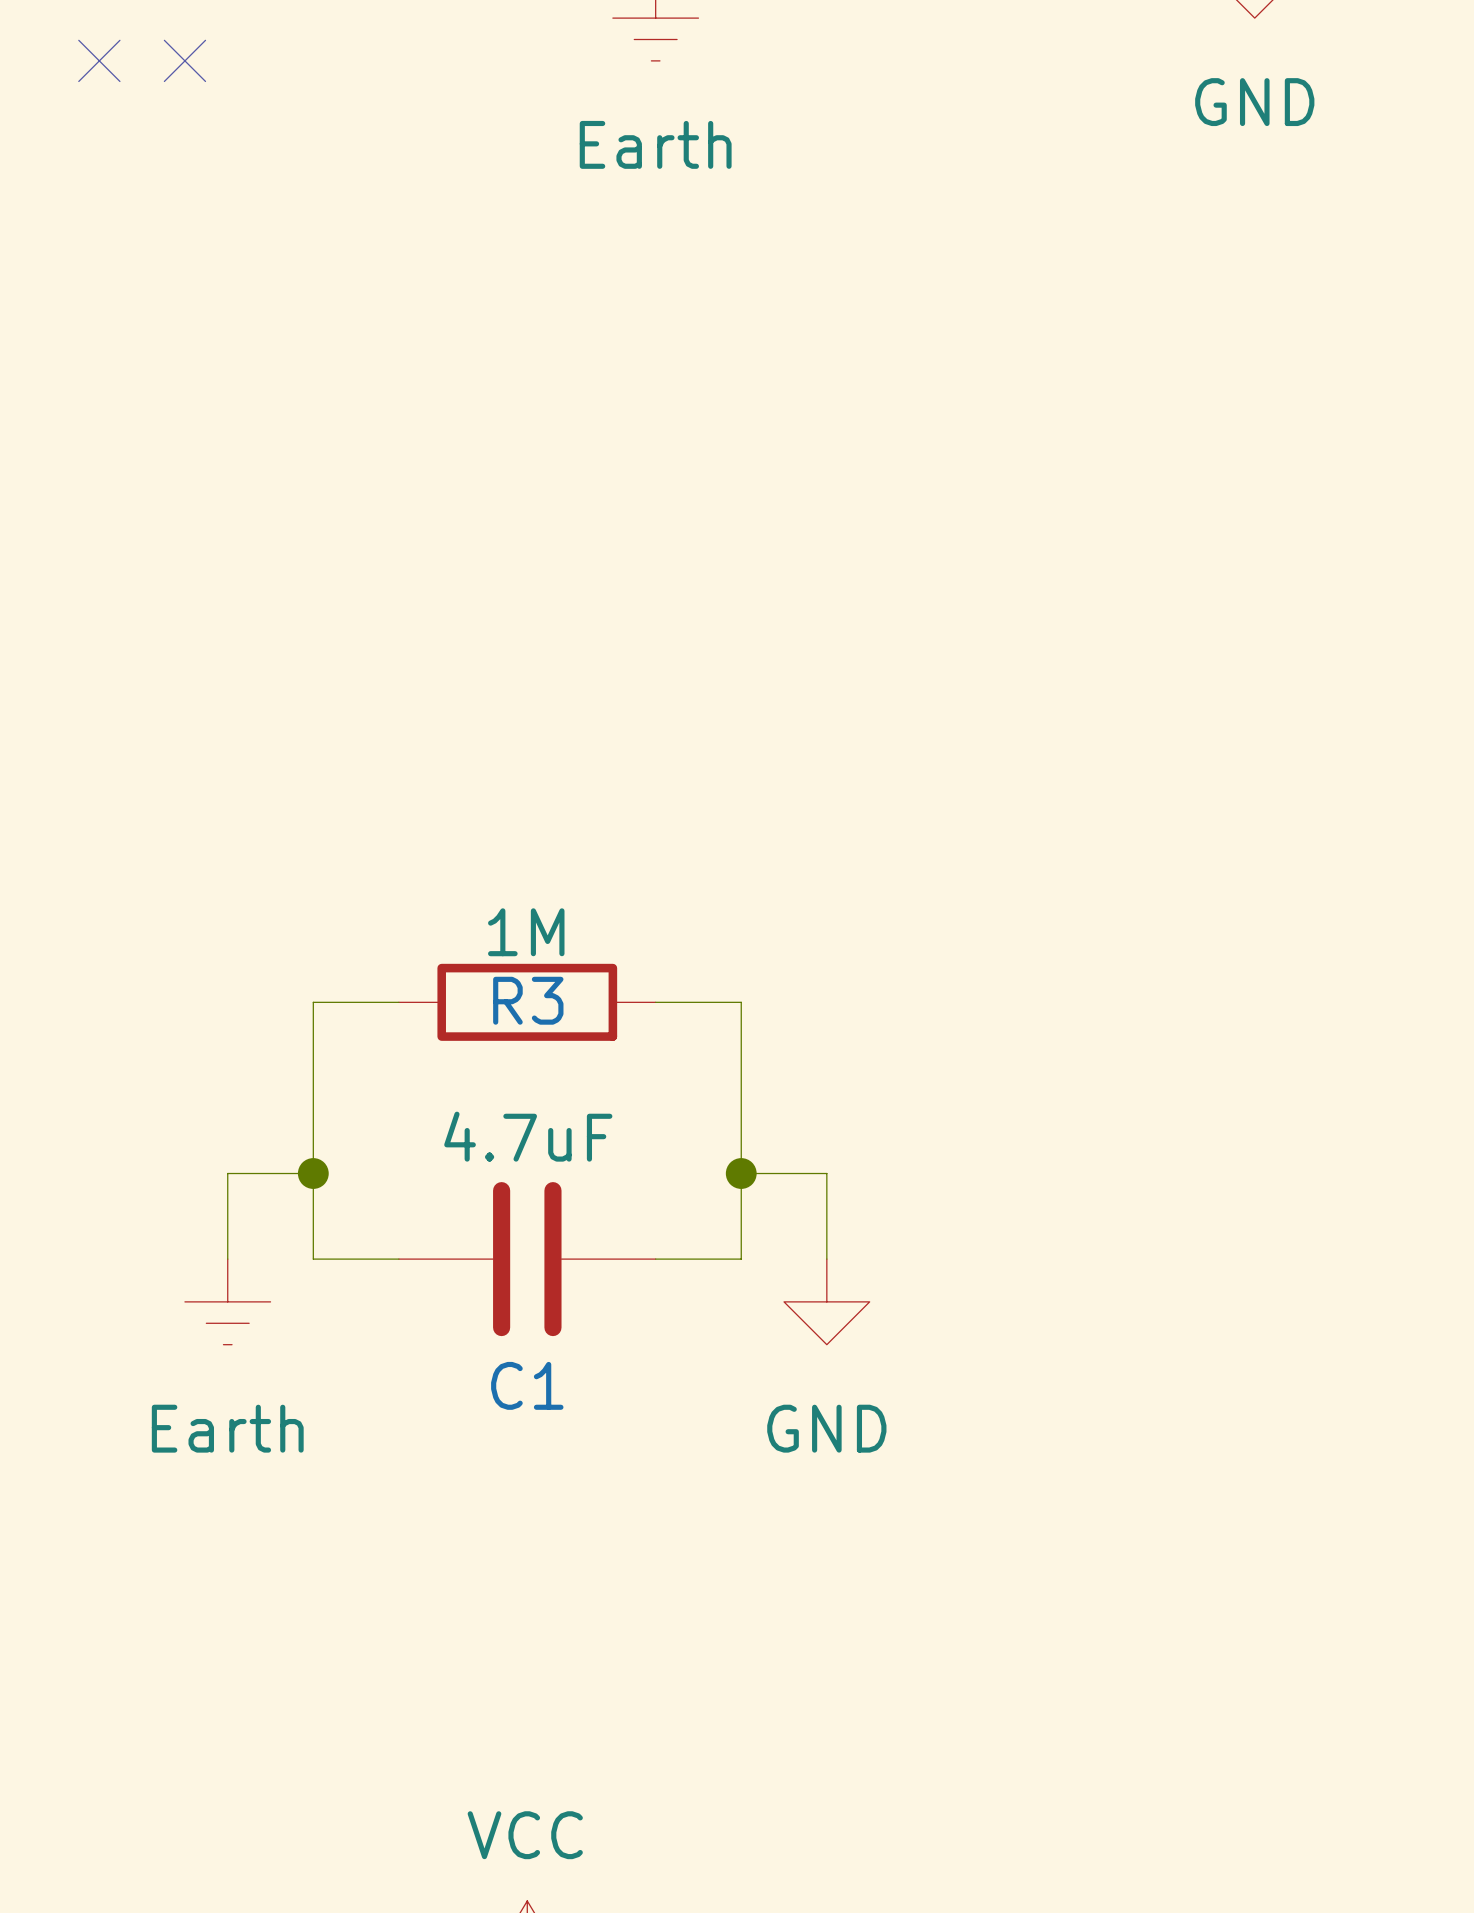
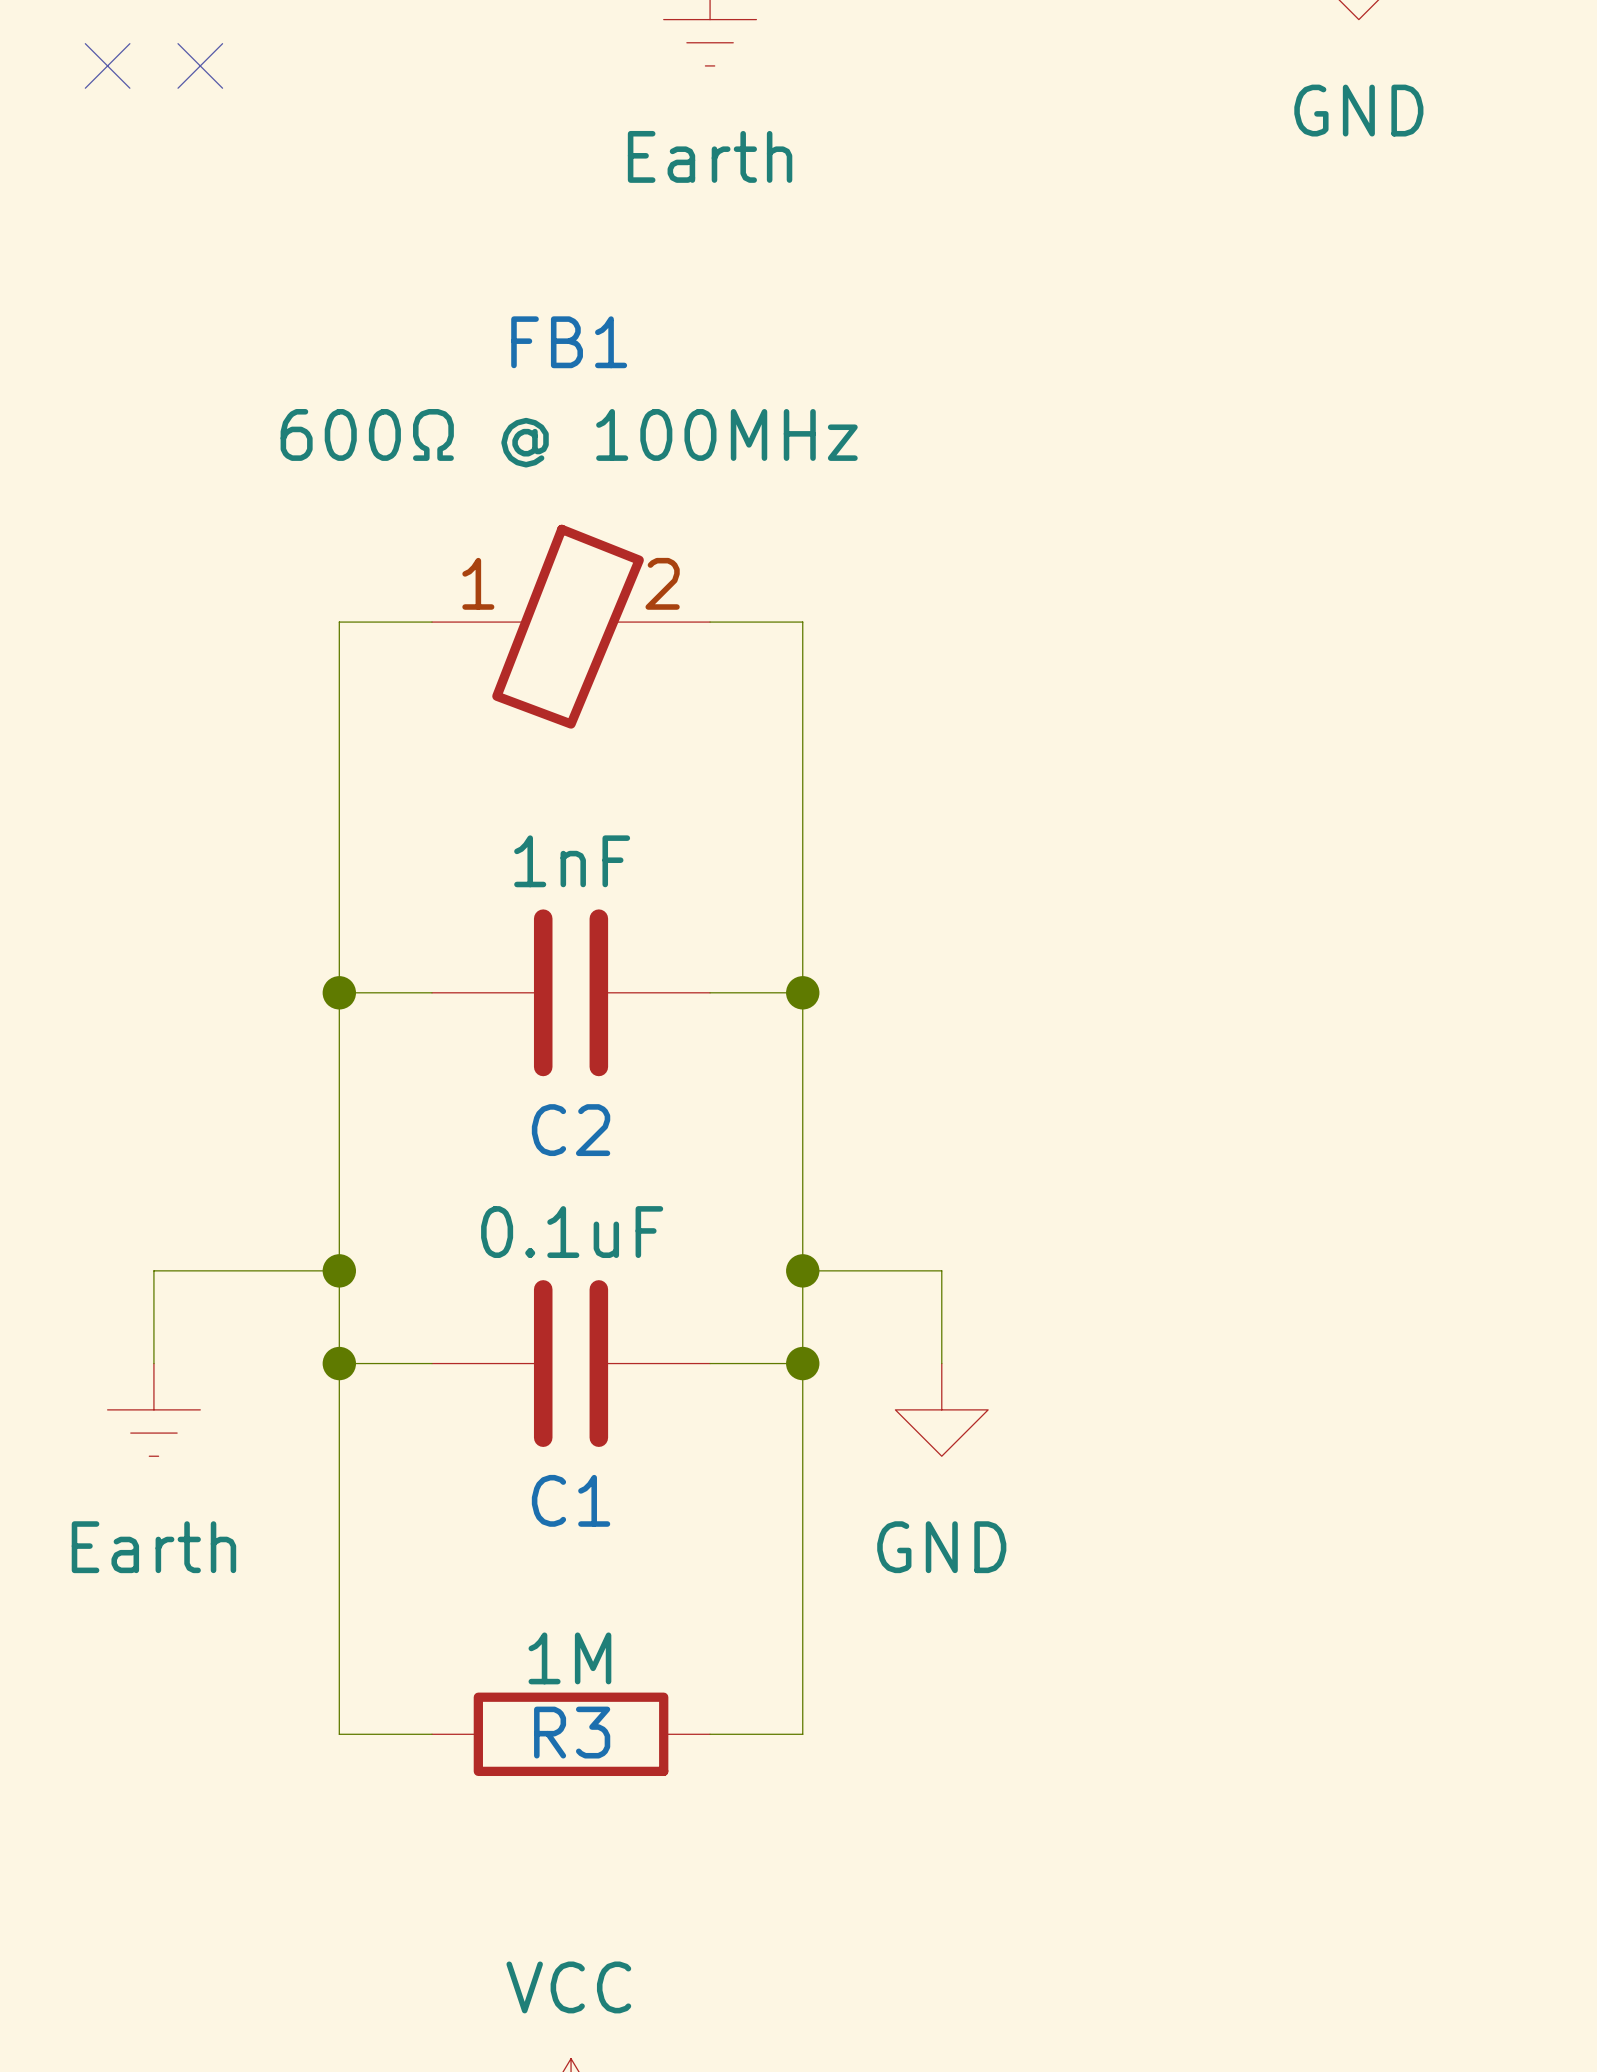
FB1: none -> 600Ω @ 100MHz (571, 626)
wire: none -> (339, 992) (432, 992)
junction: none -> (339, 992)
C2: none -> 1nF (571, 992)
wire: none -> (710, 992) (802, 992)
junction: none -> (802, 992)
wire: (313, 1002) (398, 1002) -> (339, 1085) (339, 622) (432, 622)
R3 position: (527, 1002) -> (571, 1734)
wire: (655, 1002) (741, 1002) -> (710, 622) (802, 622) (802, 1085)
C1 value: 4.7uF (528, 1136) -> 0.1uF (572, 1232)
wire: (227, 1173) (227, 1259) -> (246, 1270) (153, 1270) (153, 1363)
wire: (826, 1173) (826, 1259) -> (895, 1270) (941, 1270) (941, 1363)
wire: none -> (339, 1363) (339, 1734) (432, 1734)
junction: none -> (339, 1363)
wire: none -> (802, 1363) (802, 1734) (710, 1734)
junction: none -> (802, 1363)
power symbol position: Earth (227, 1301) -> Earth (153, 1409)
power symbol position: GND (826, 1301) -> GND (941, 1409)

